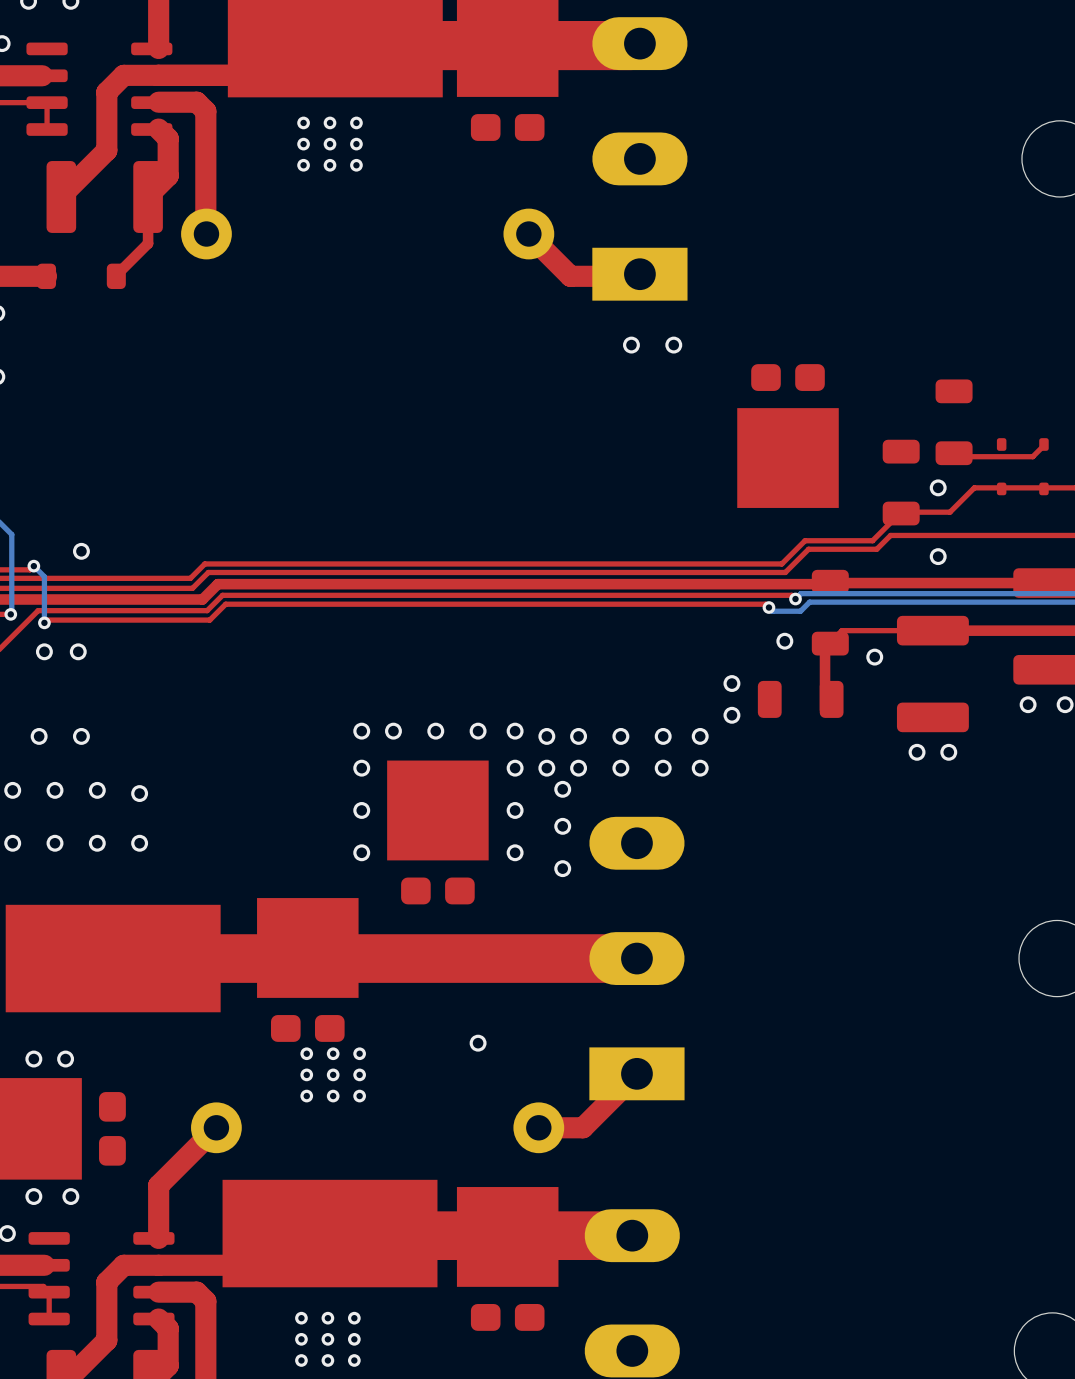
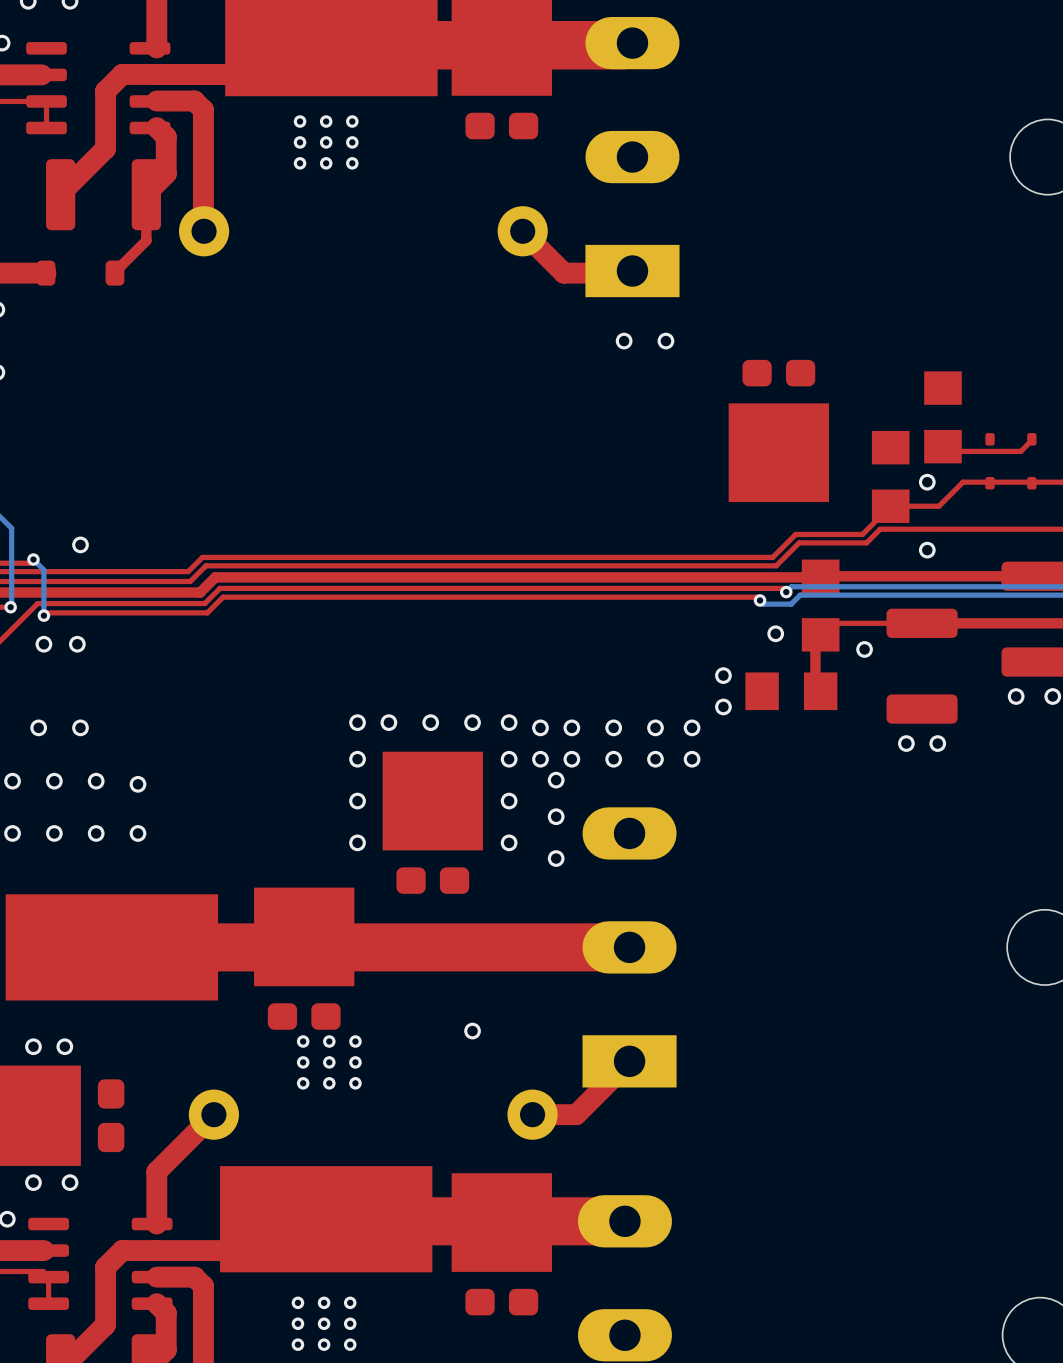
part footprint: [935, 379, 973, 466] -> [924, 371, 962, 464]
part footprint: [882, 439, 920, 526] -> [871, 430, 910, 523]
part footprint: [811, 569, 849, 656] -> [801, 559, 840, 652]
part footprint: [757, 680, 844, 718] -> [745, 672, 838, 711]

